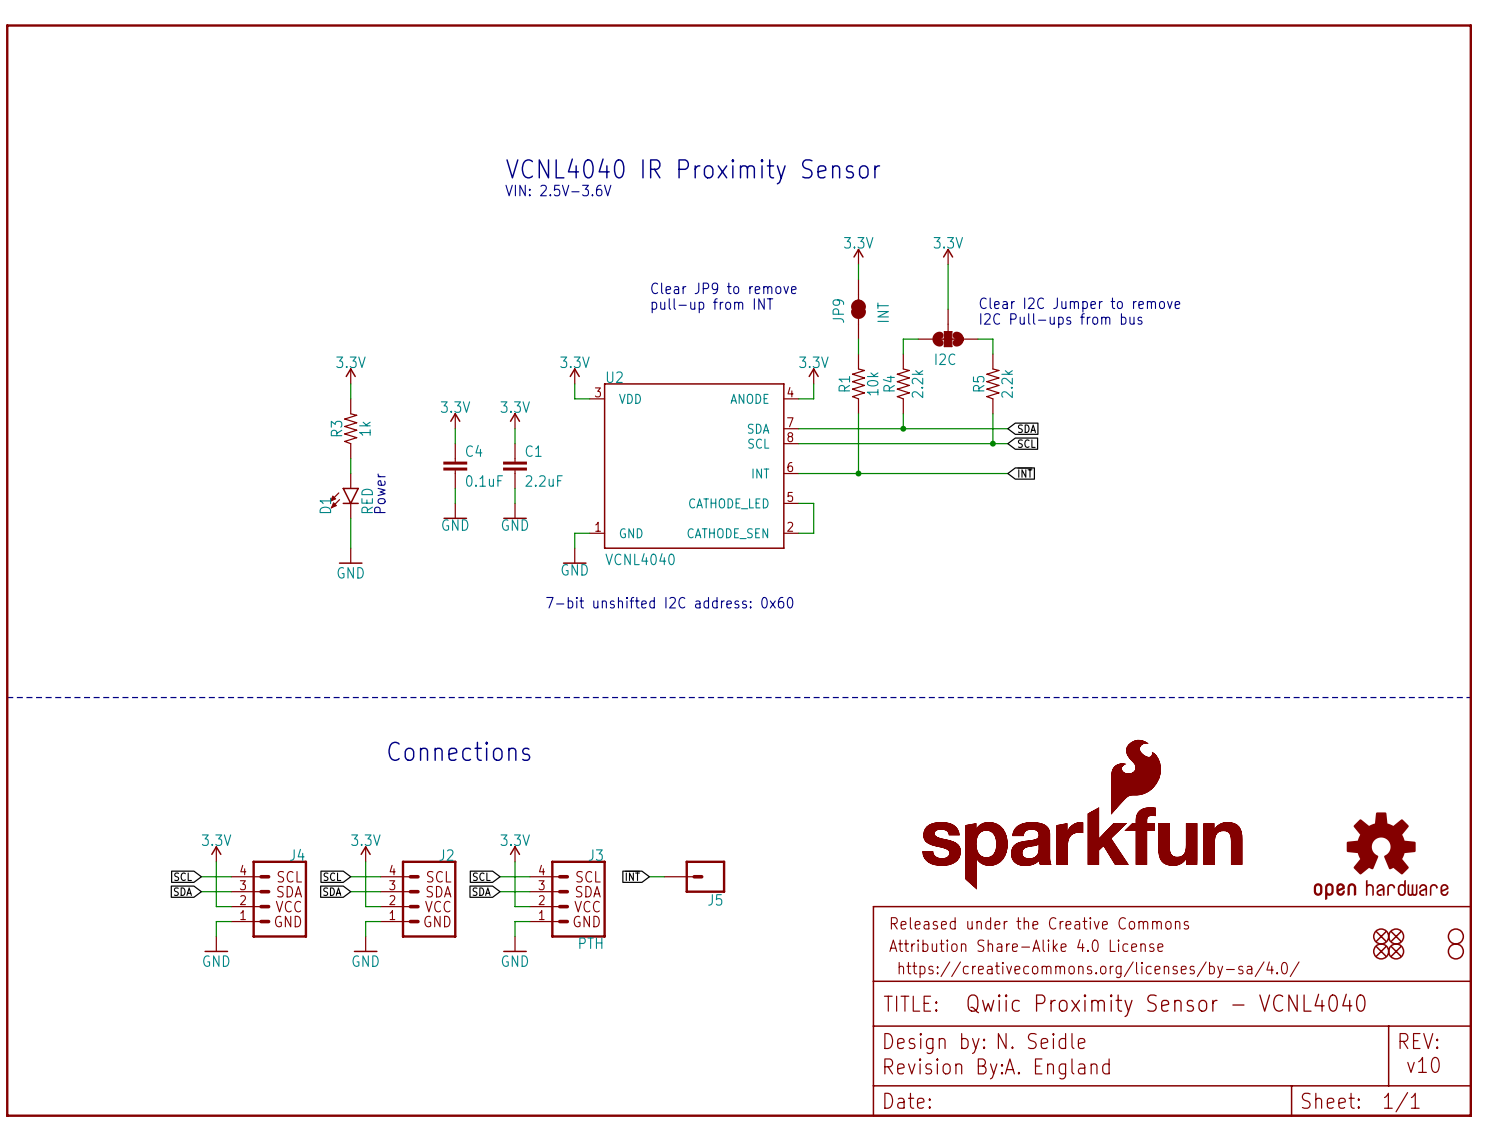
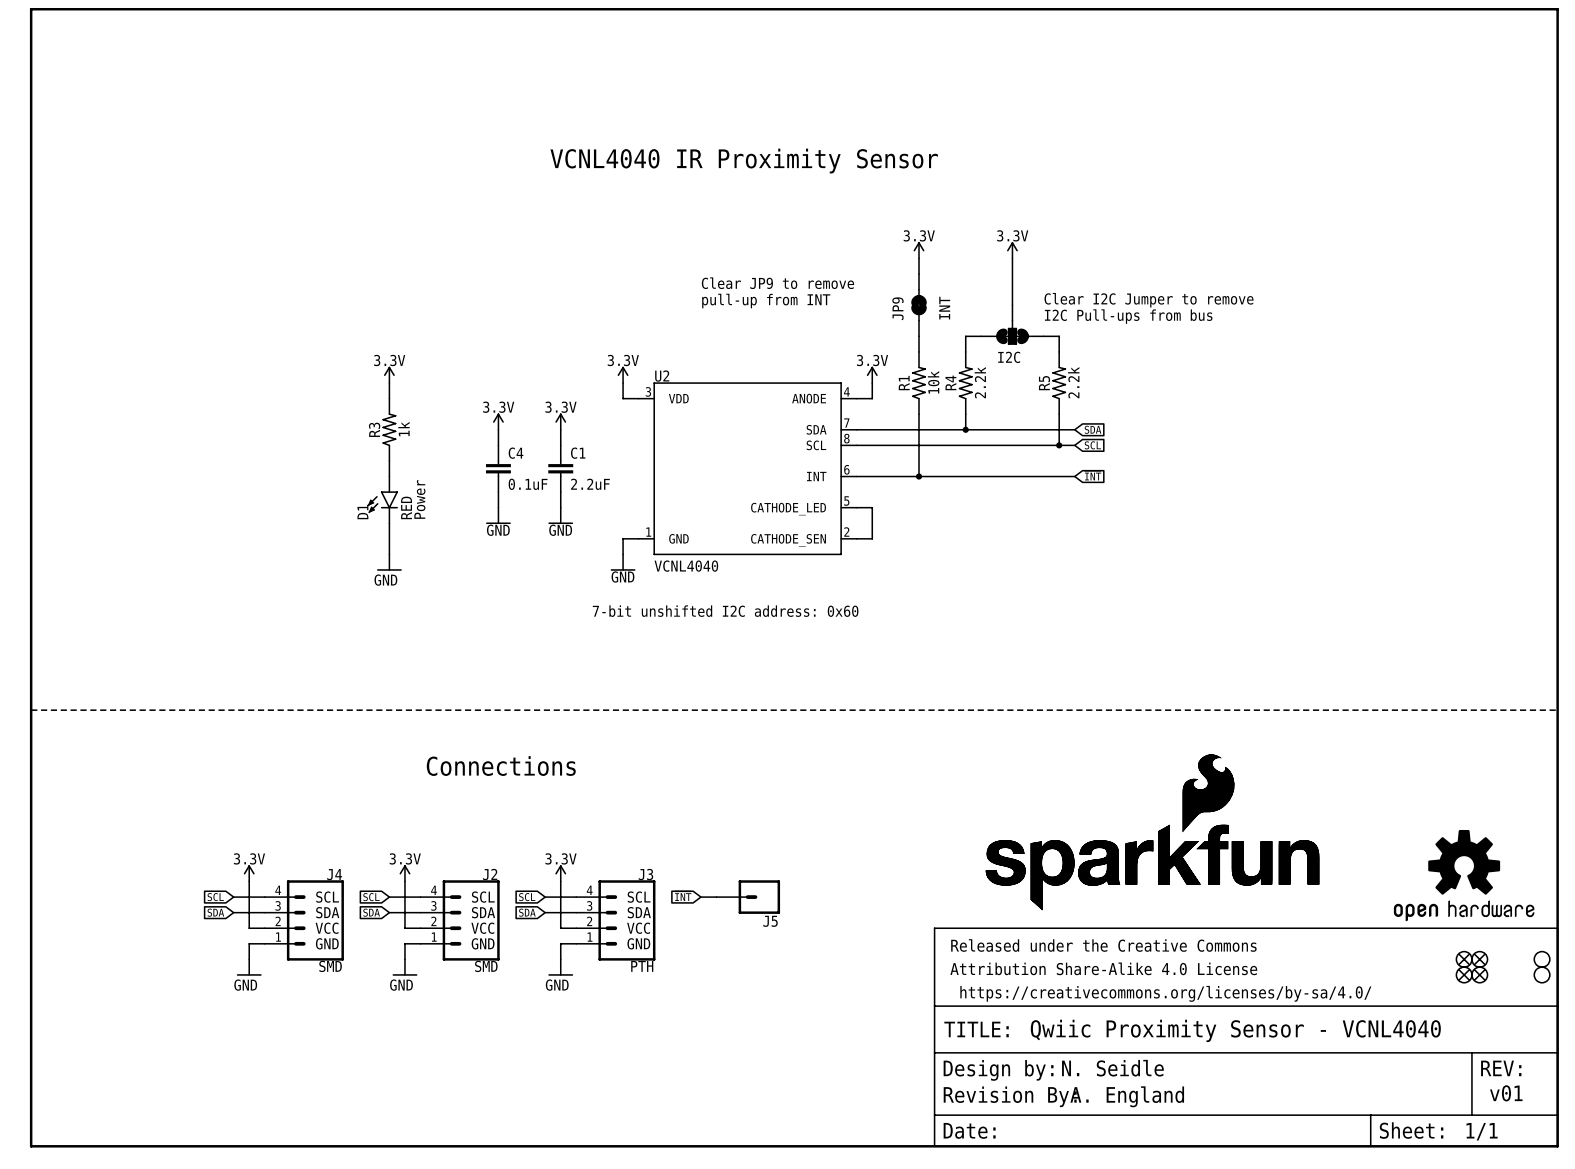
text: VIN: 2.5V-3.6V (558, 190) -> none
J4 value: none -> SMD (330, 966)
J2 value: none -> SMD (486, 966)
text: v10 (1423, 1064) -> v01 (1506, 1093)

